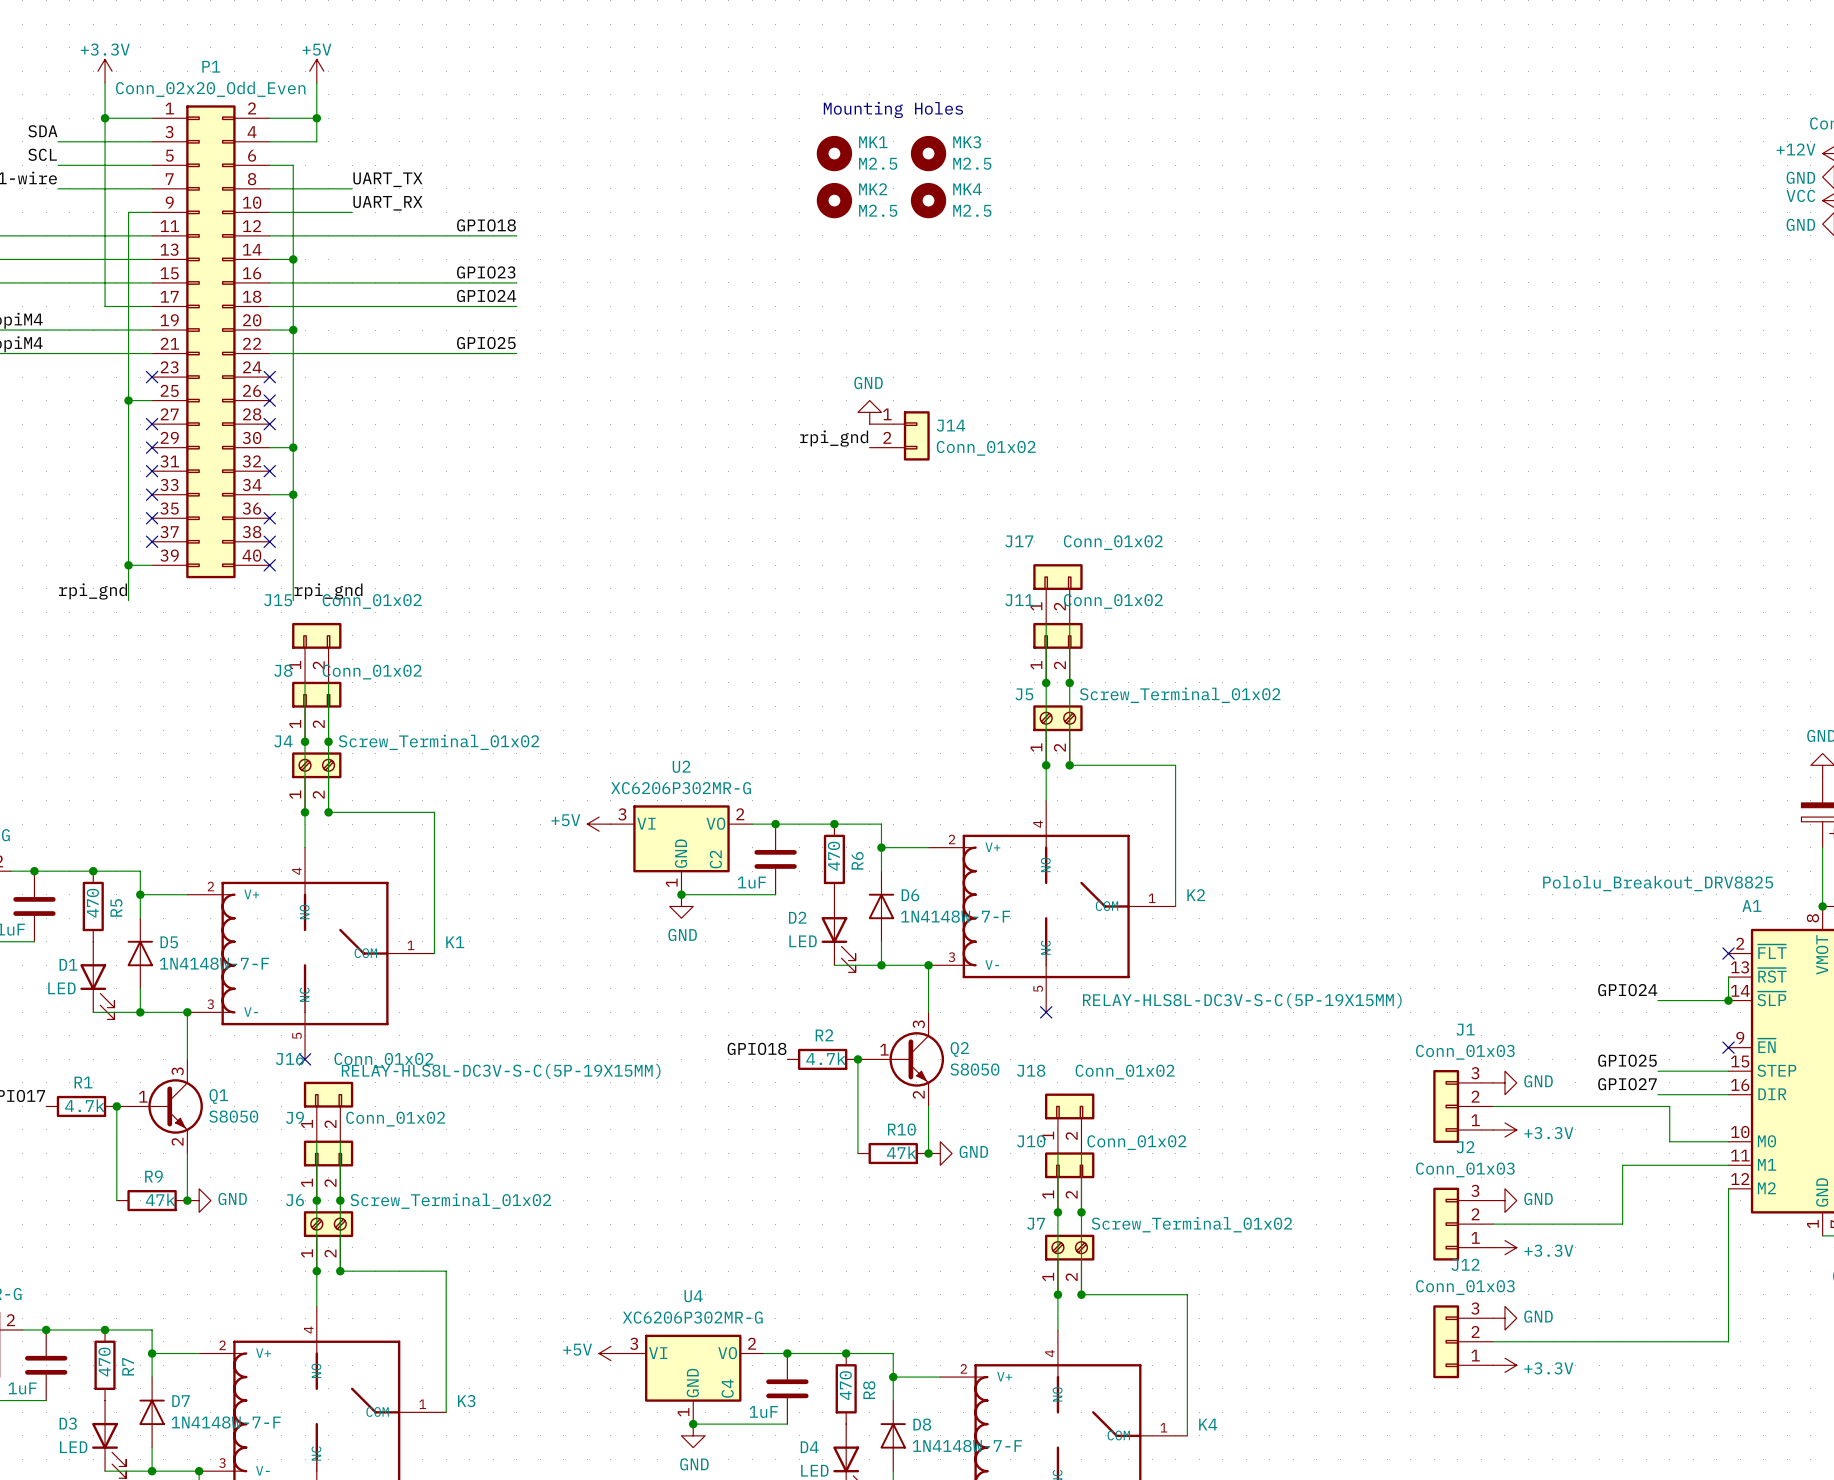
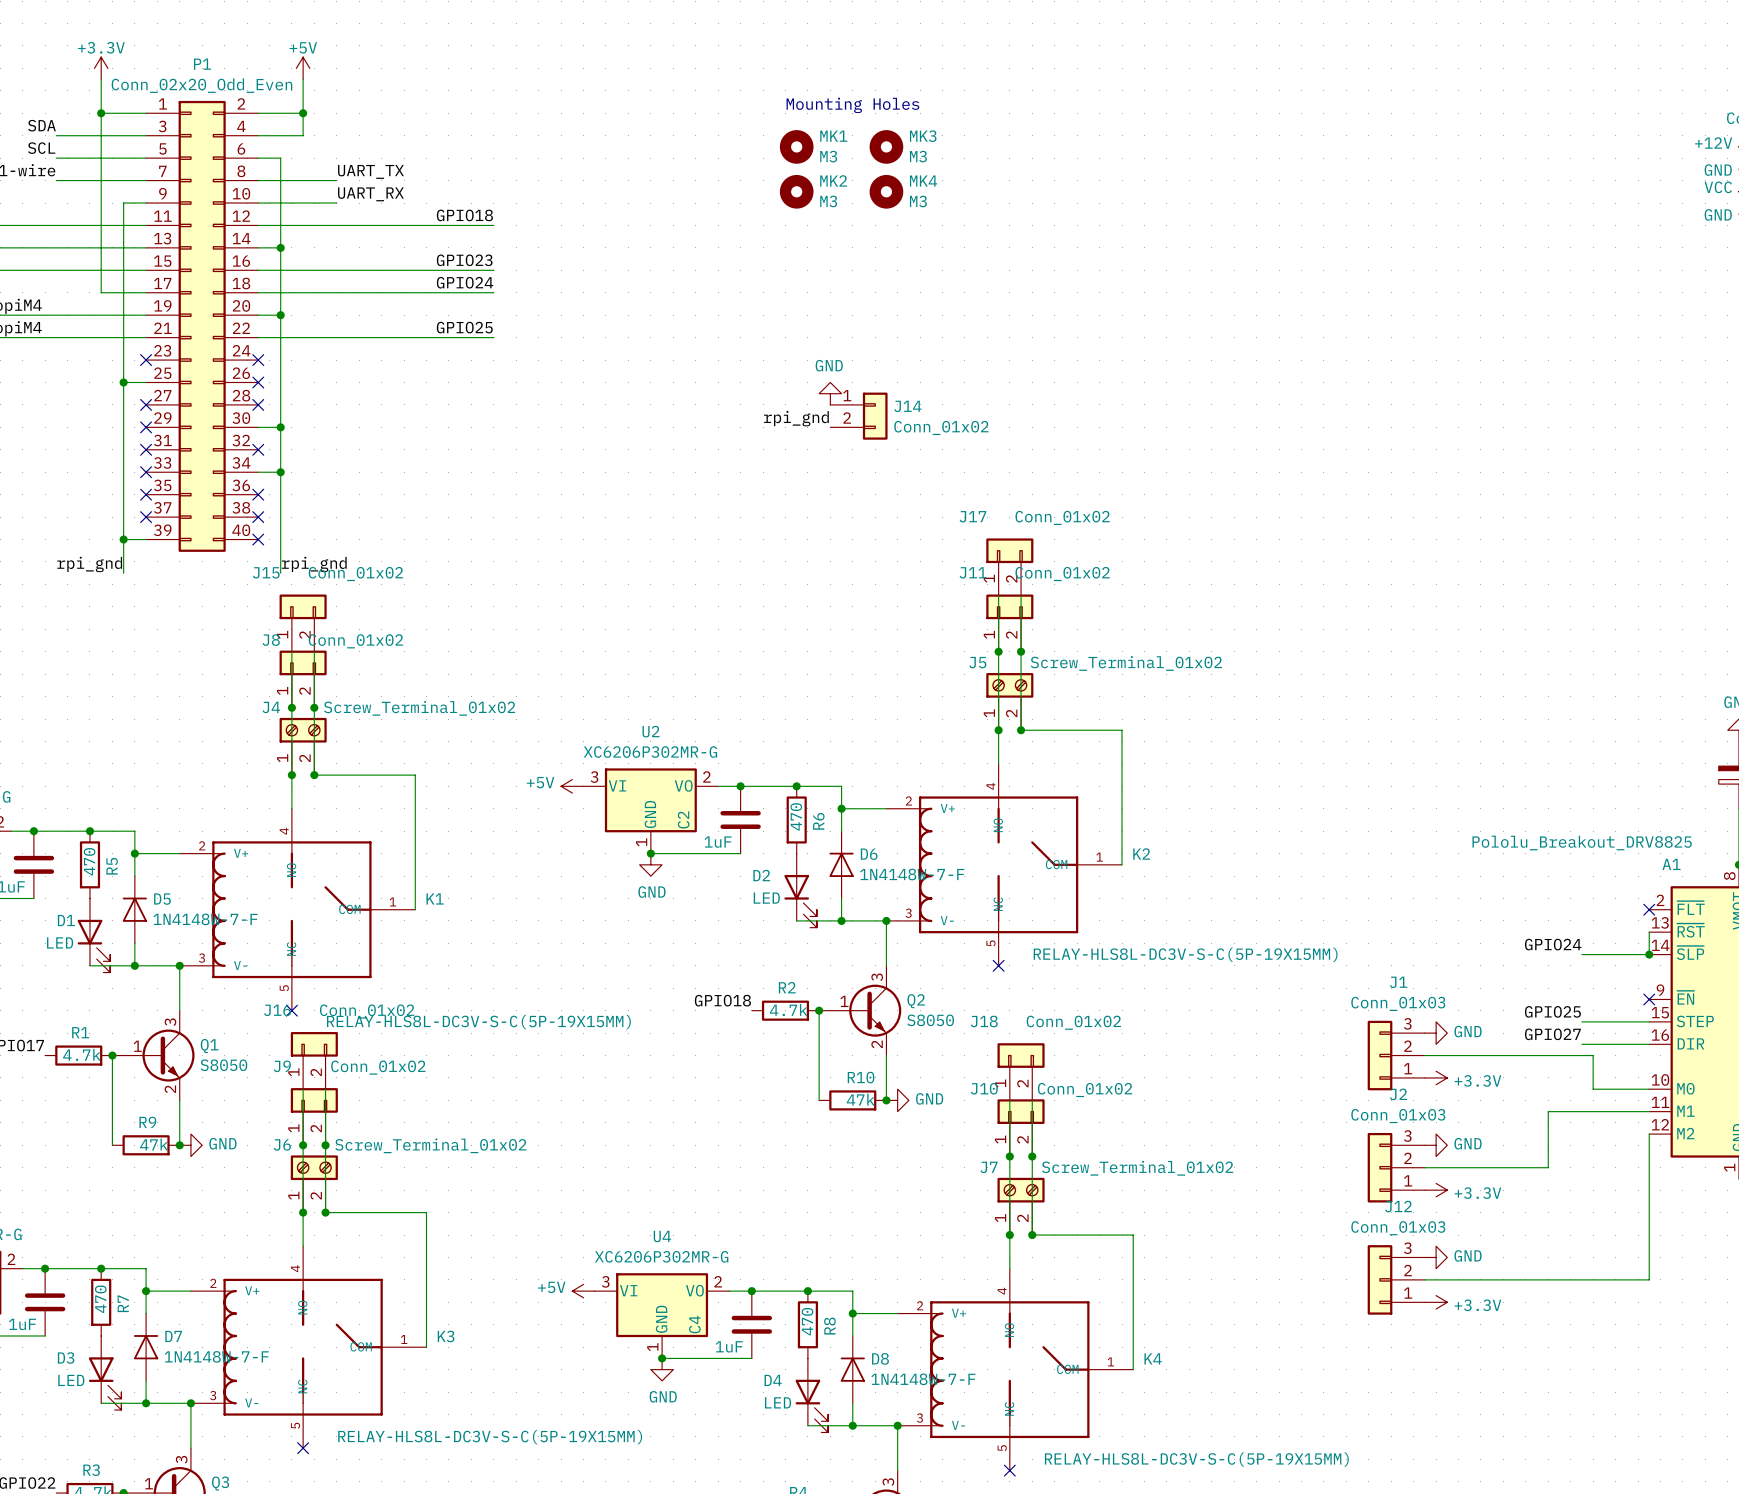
MK1 value: M2.5 (878, 163) -> M3 (828, 156)
MK3 value: M2.5 (972, 163) -> M3 (918, 156)
MK2 value: M2.5 (878, 210) -> M3 (828, 201)
MK4 value: M2.5 (972, 210) -> M3 (918, 201)

